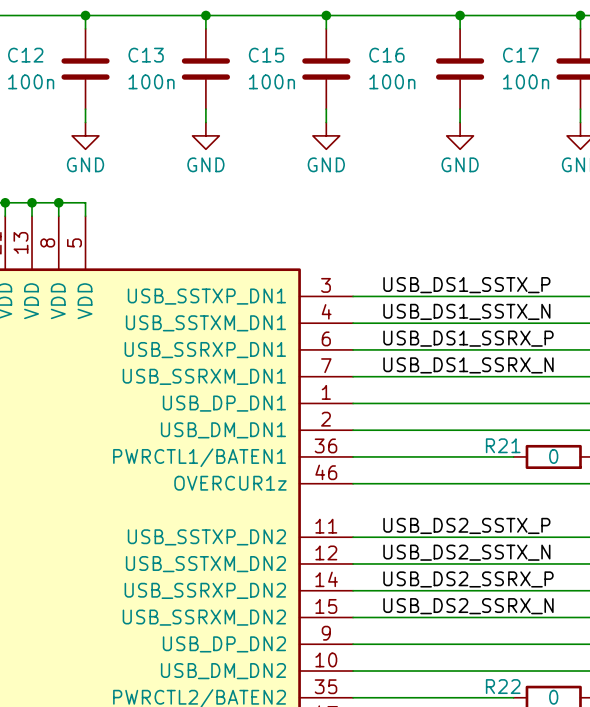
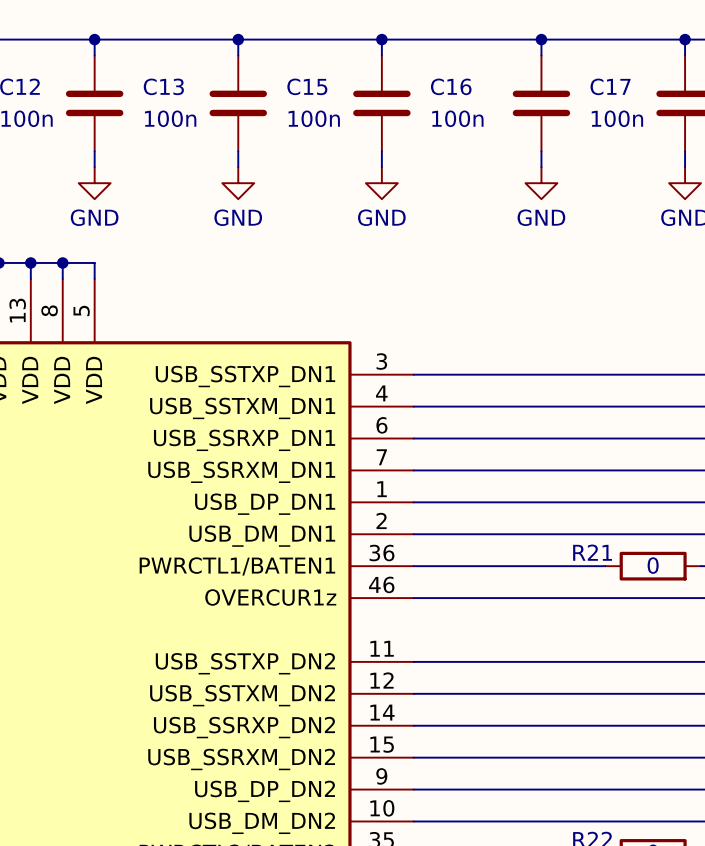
label: USB_DS1_SSTX_P (466, 285) -> none
label: USB_DS1_SSTX_N (466, 311) -> none
label: USB_DS1_SSRX_P (468, 338) -> none
label: USB_DS1_SSRX_N (468, 365) -> none
label: USB_DS2_SSTX_P (466, 525) -> none
label: USB_DS2_SSTX_N (466, 552) -> none
label: USB_DS2_SSRX_P (468, 579) -> none
label: USB_DS2_SSRX_N (468, 606) -> none

